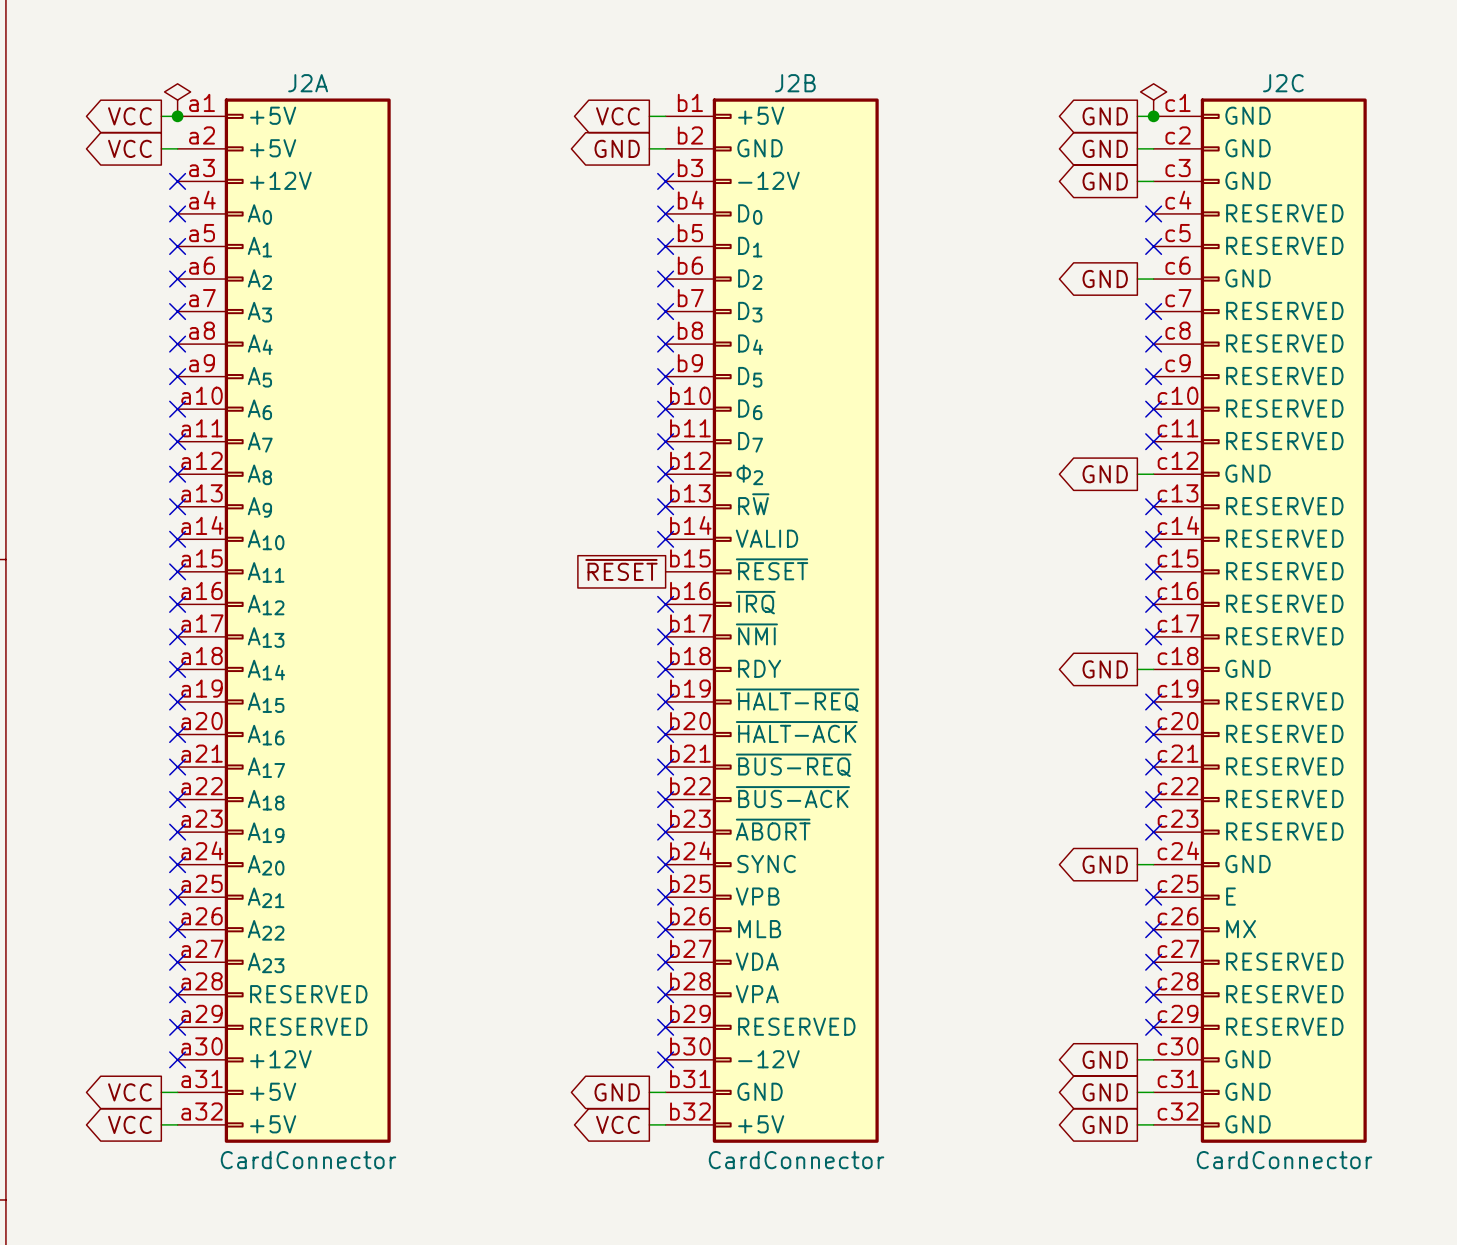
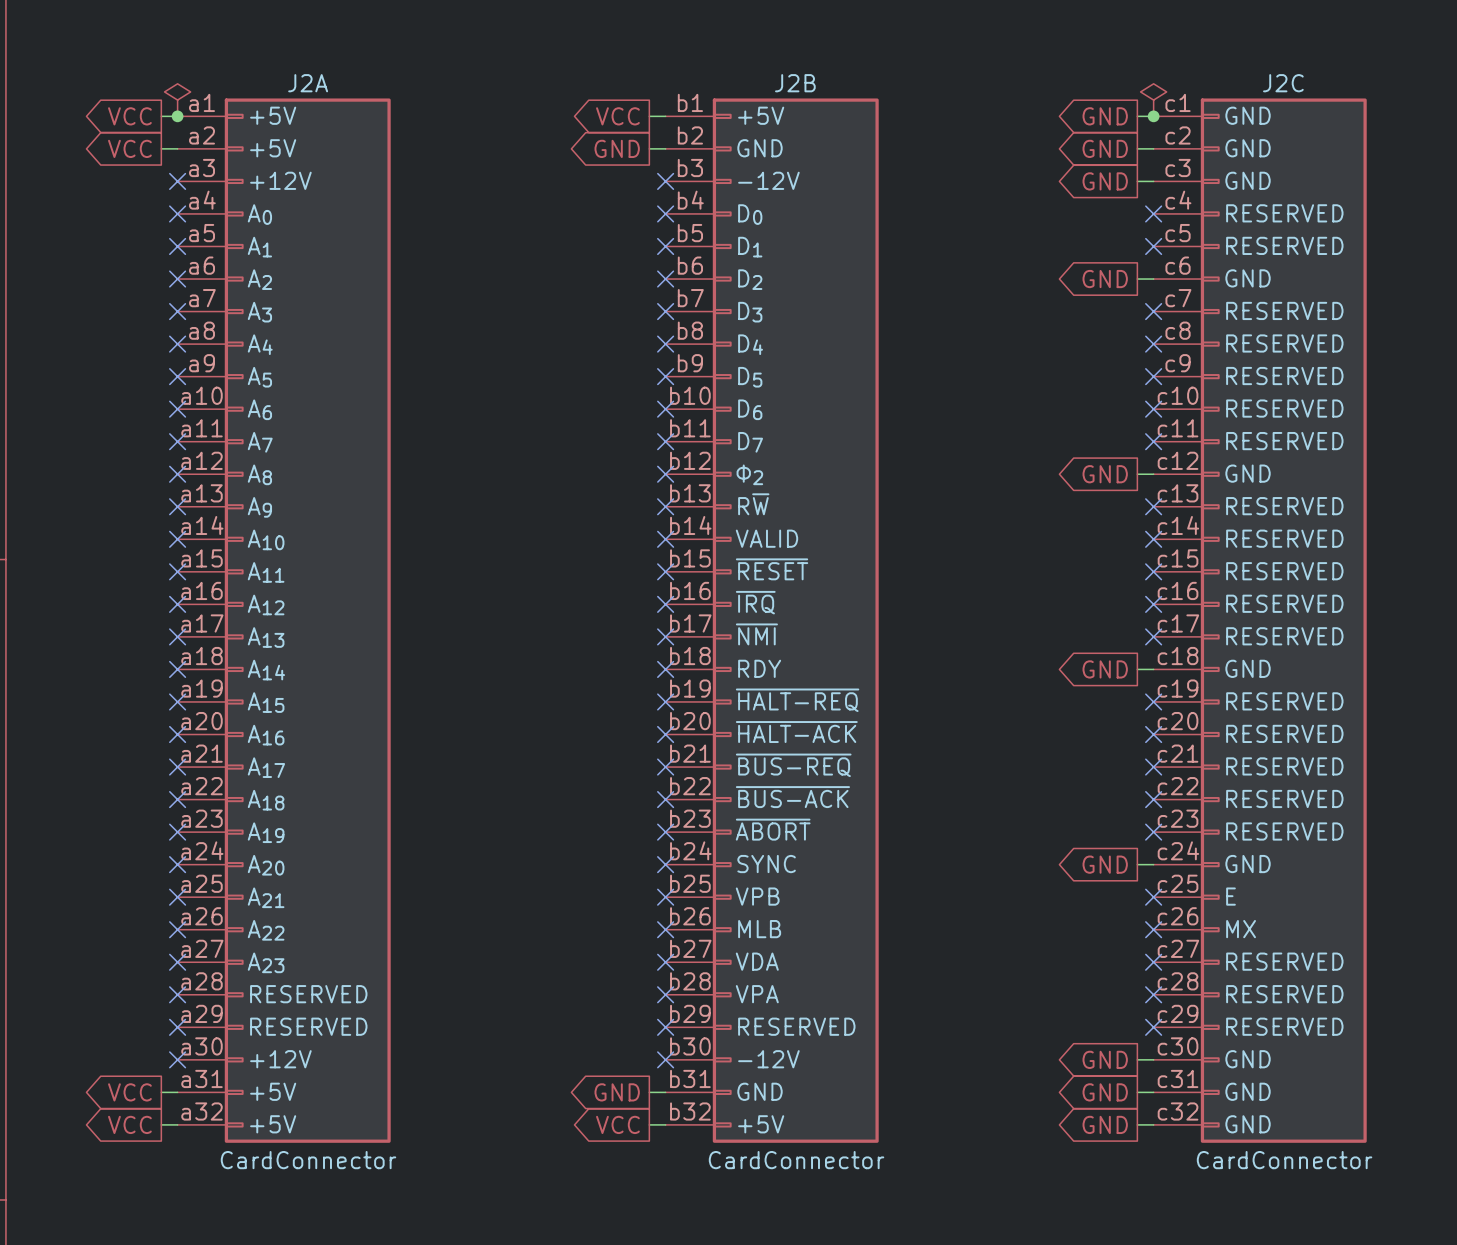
global label: ~{RESET} (621, 569) -> none
no-connect mark: none -> (665, 571)

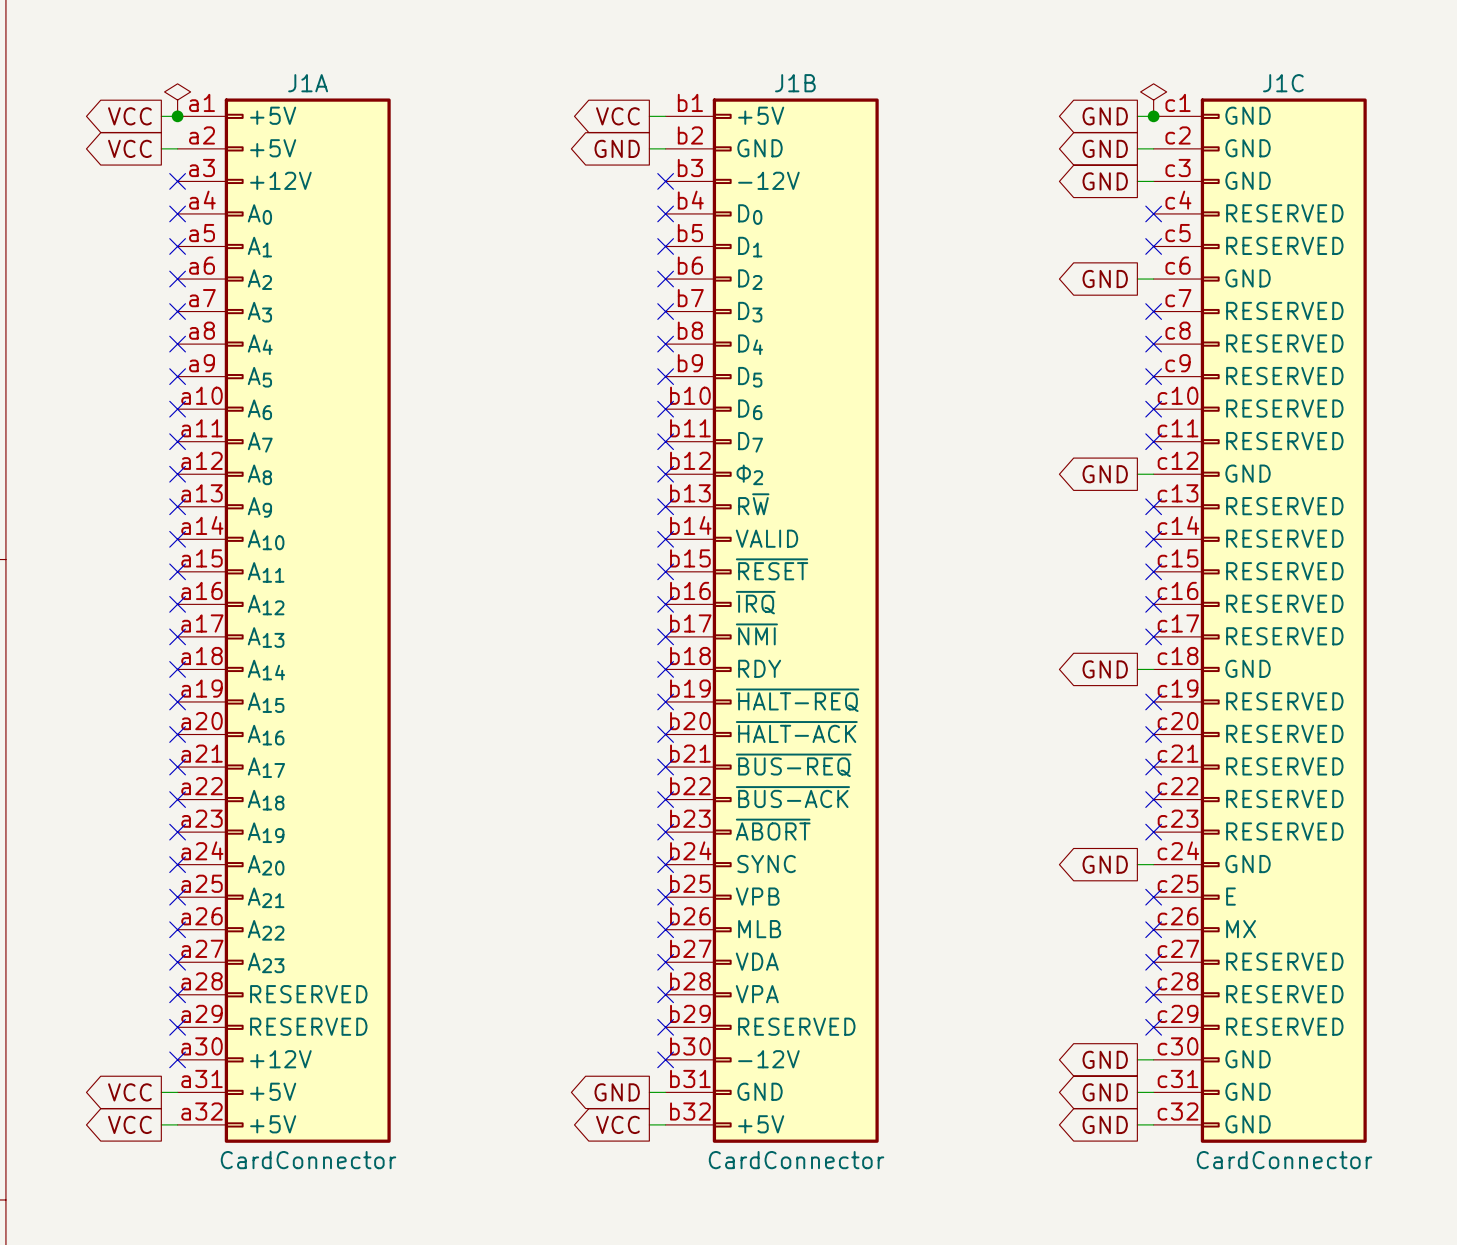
J2A name: J2A (308, 83) -> J1A (308, 83)
J2B name: J2B (795, 83) -> J1B (795, 83)
J2C name: J2C (1283, 83) -> J1C (1283, 83)

